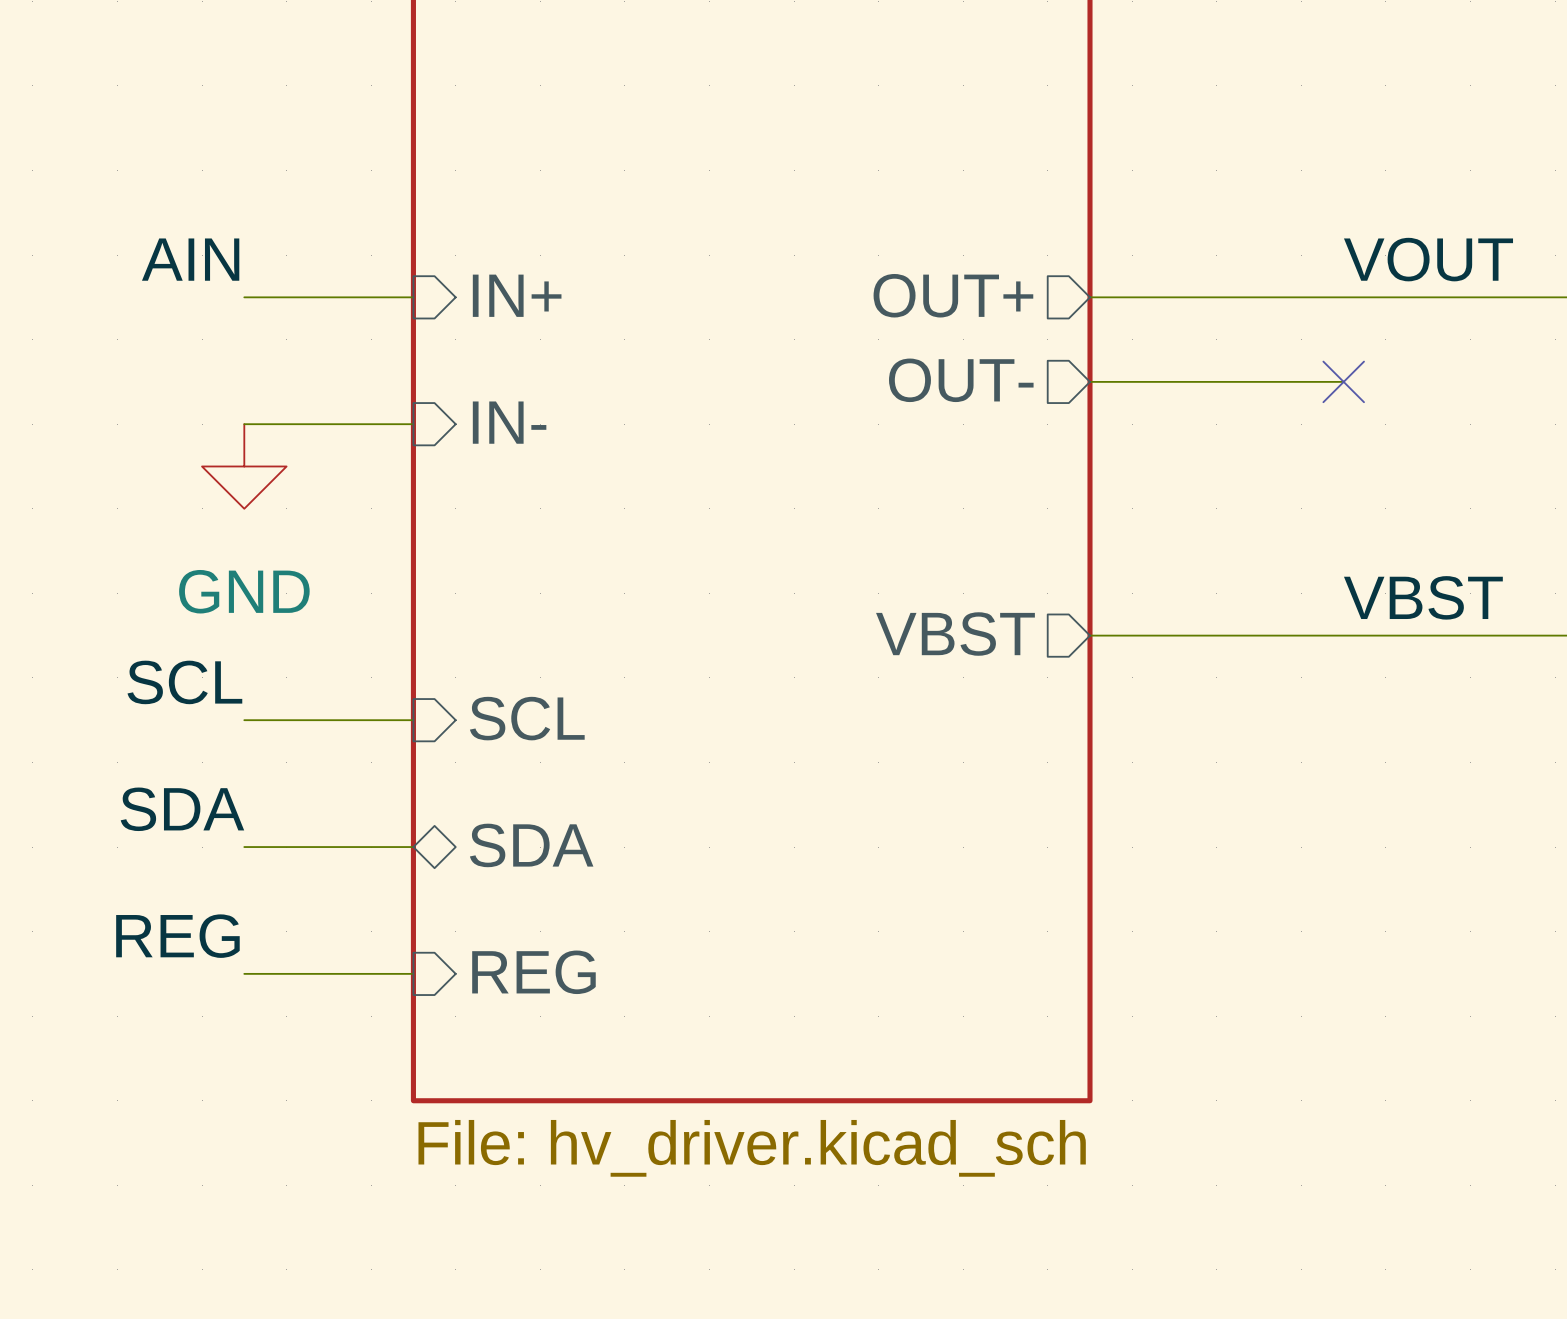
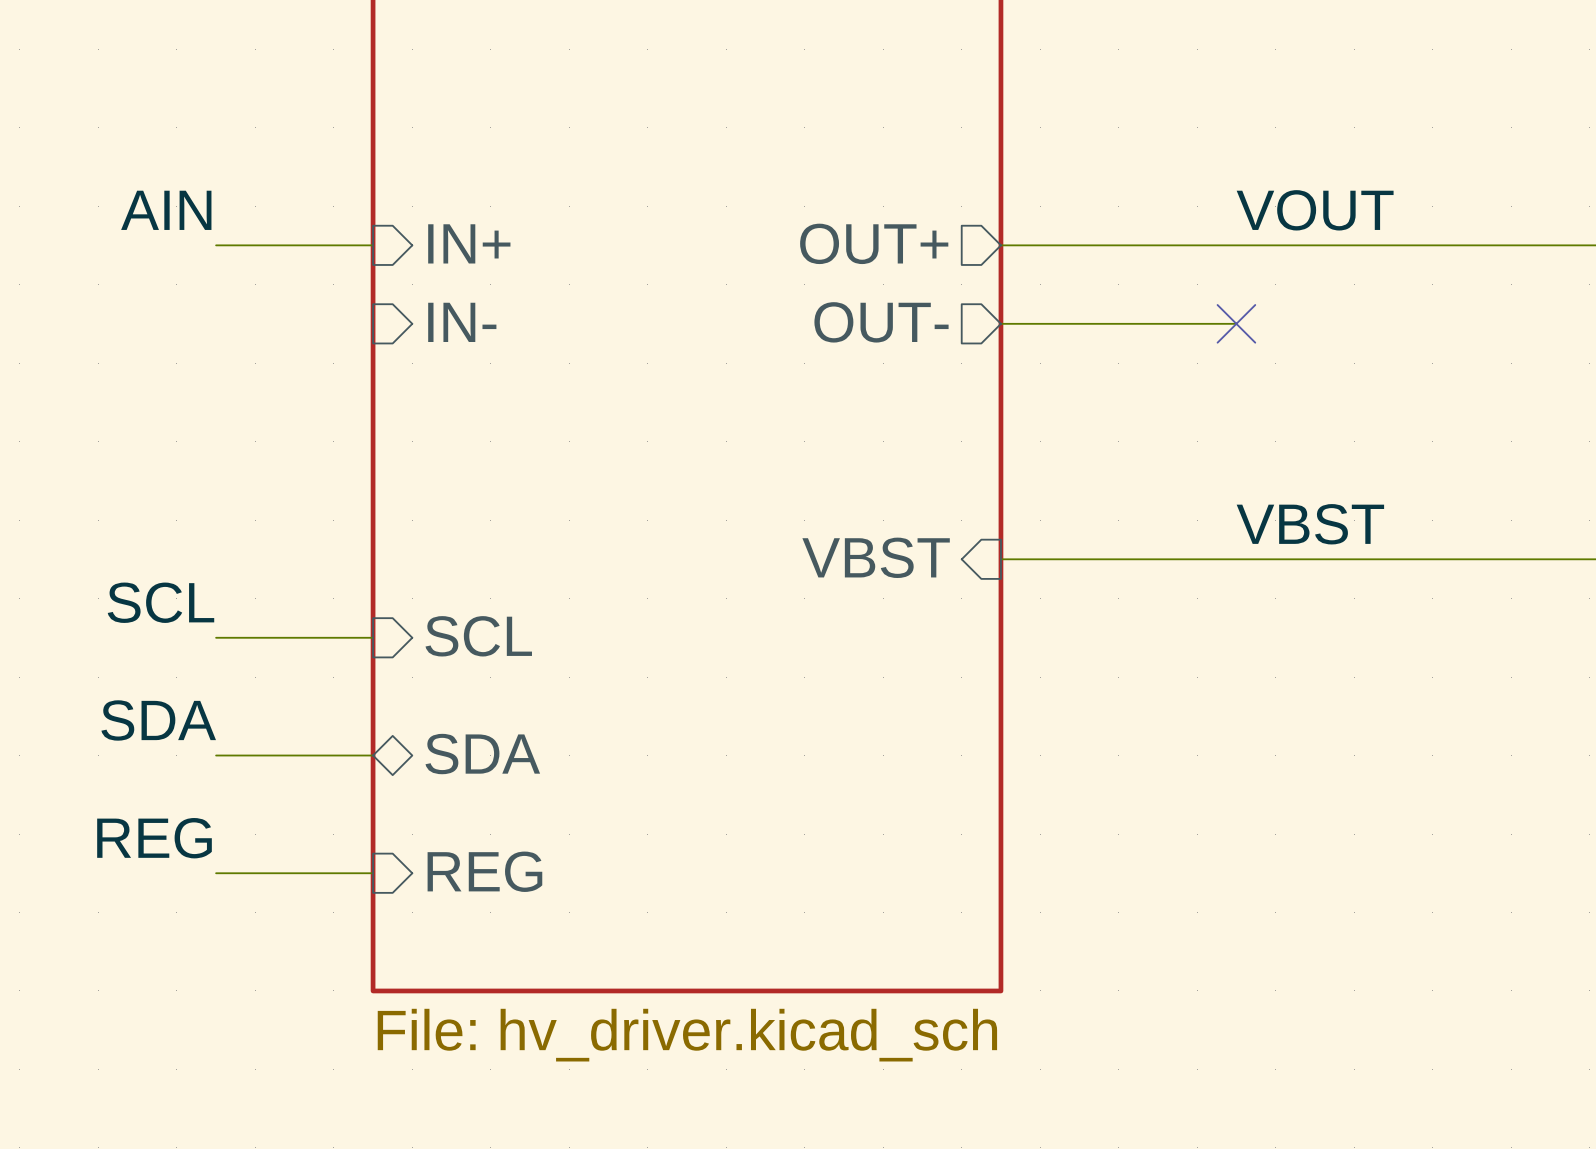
sheet pin position: IN- (509, 422) -> IN- (462, 322)
wire: (244, 424) (413, 424) -> none
power symbol: GND (244, 466) -> none
sheet pin shape: output (955, 634) -> input (876, 557)

